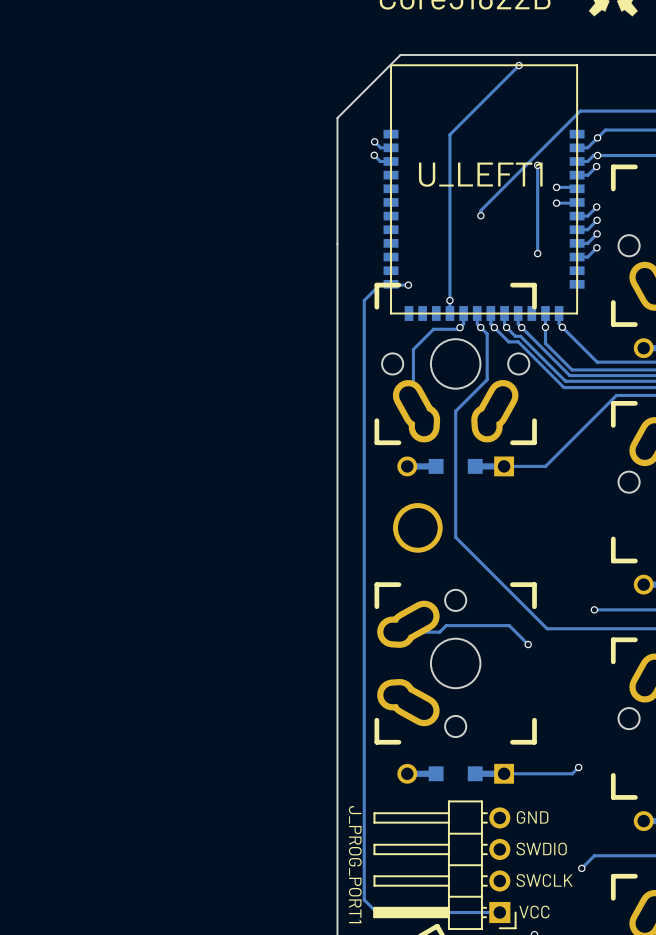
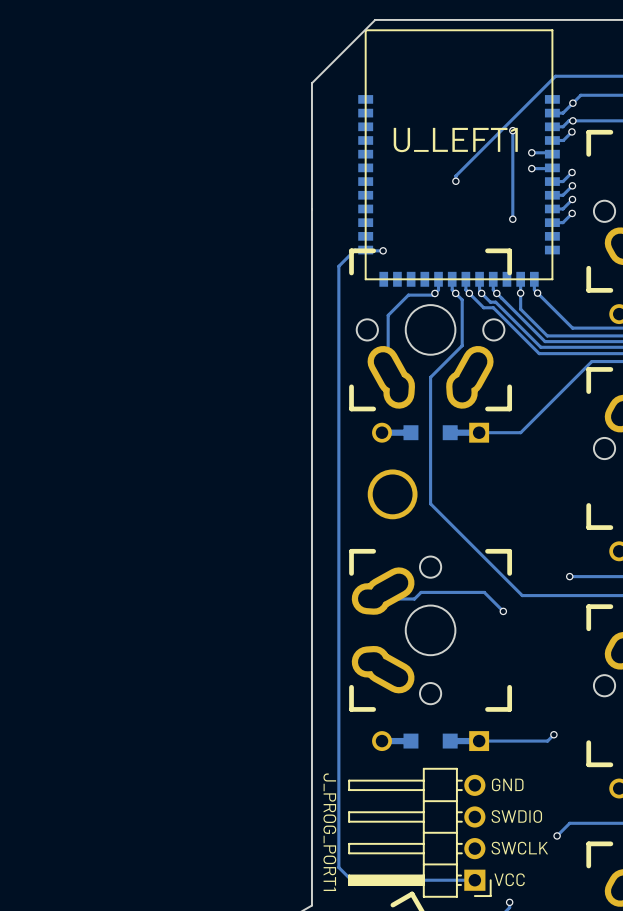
track: (519, 65) (449, 134) (449, 313) -> none
via: (519, 65) -> none
track: (374, 141) (380, 147) (390, 147) -> none
via: (374, 141) -> none
track: (374, 155) (380, 161) (390, 161) -> none
via: (374, 155) -> none
via: (449, 300) -> none

